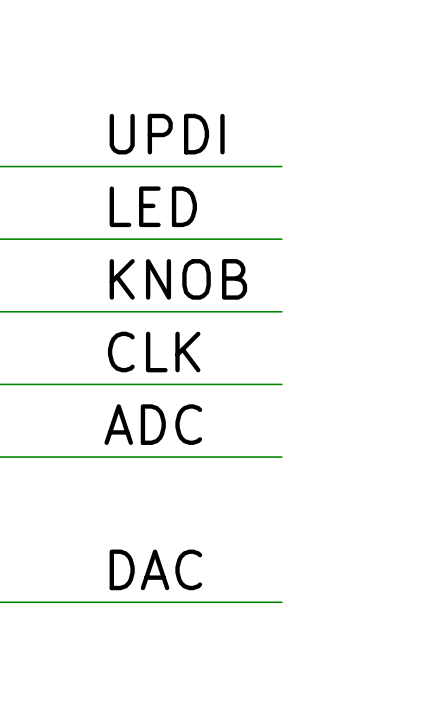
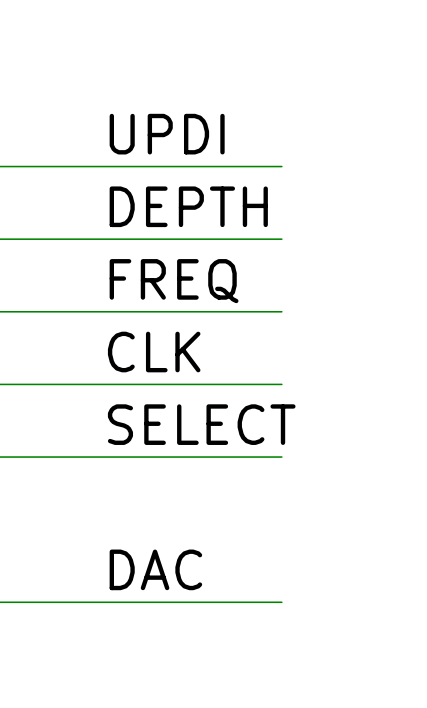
label: LED (153, 206) -> DEPTH (188, 206)
label: KNOB (178, 279) -> FREQ (174, 281)
label: ADC (153, 424) -> SELECT (201, 424)

